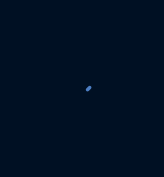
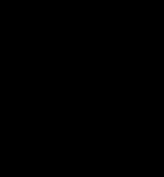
bottom track: (89, 87) (87, 89) -> none

